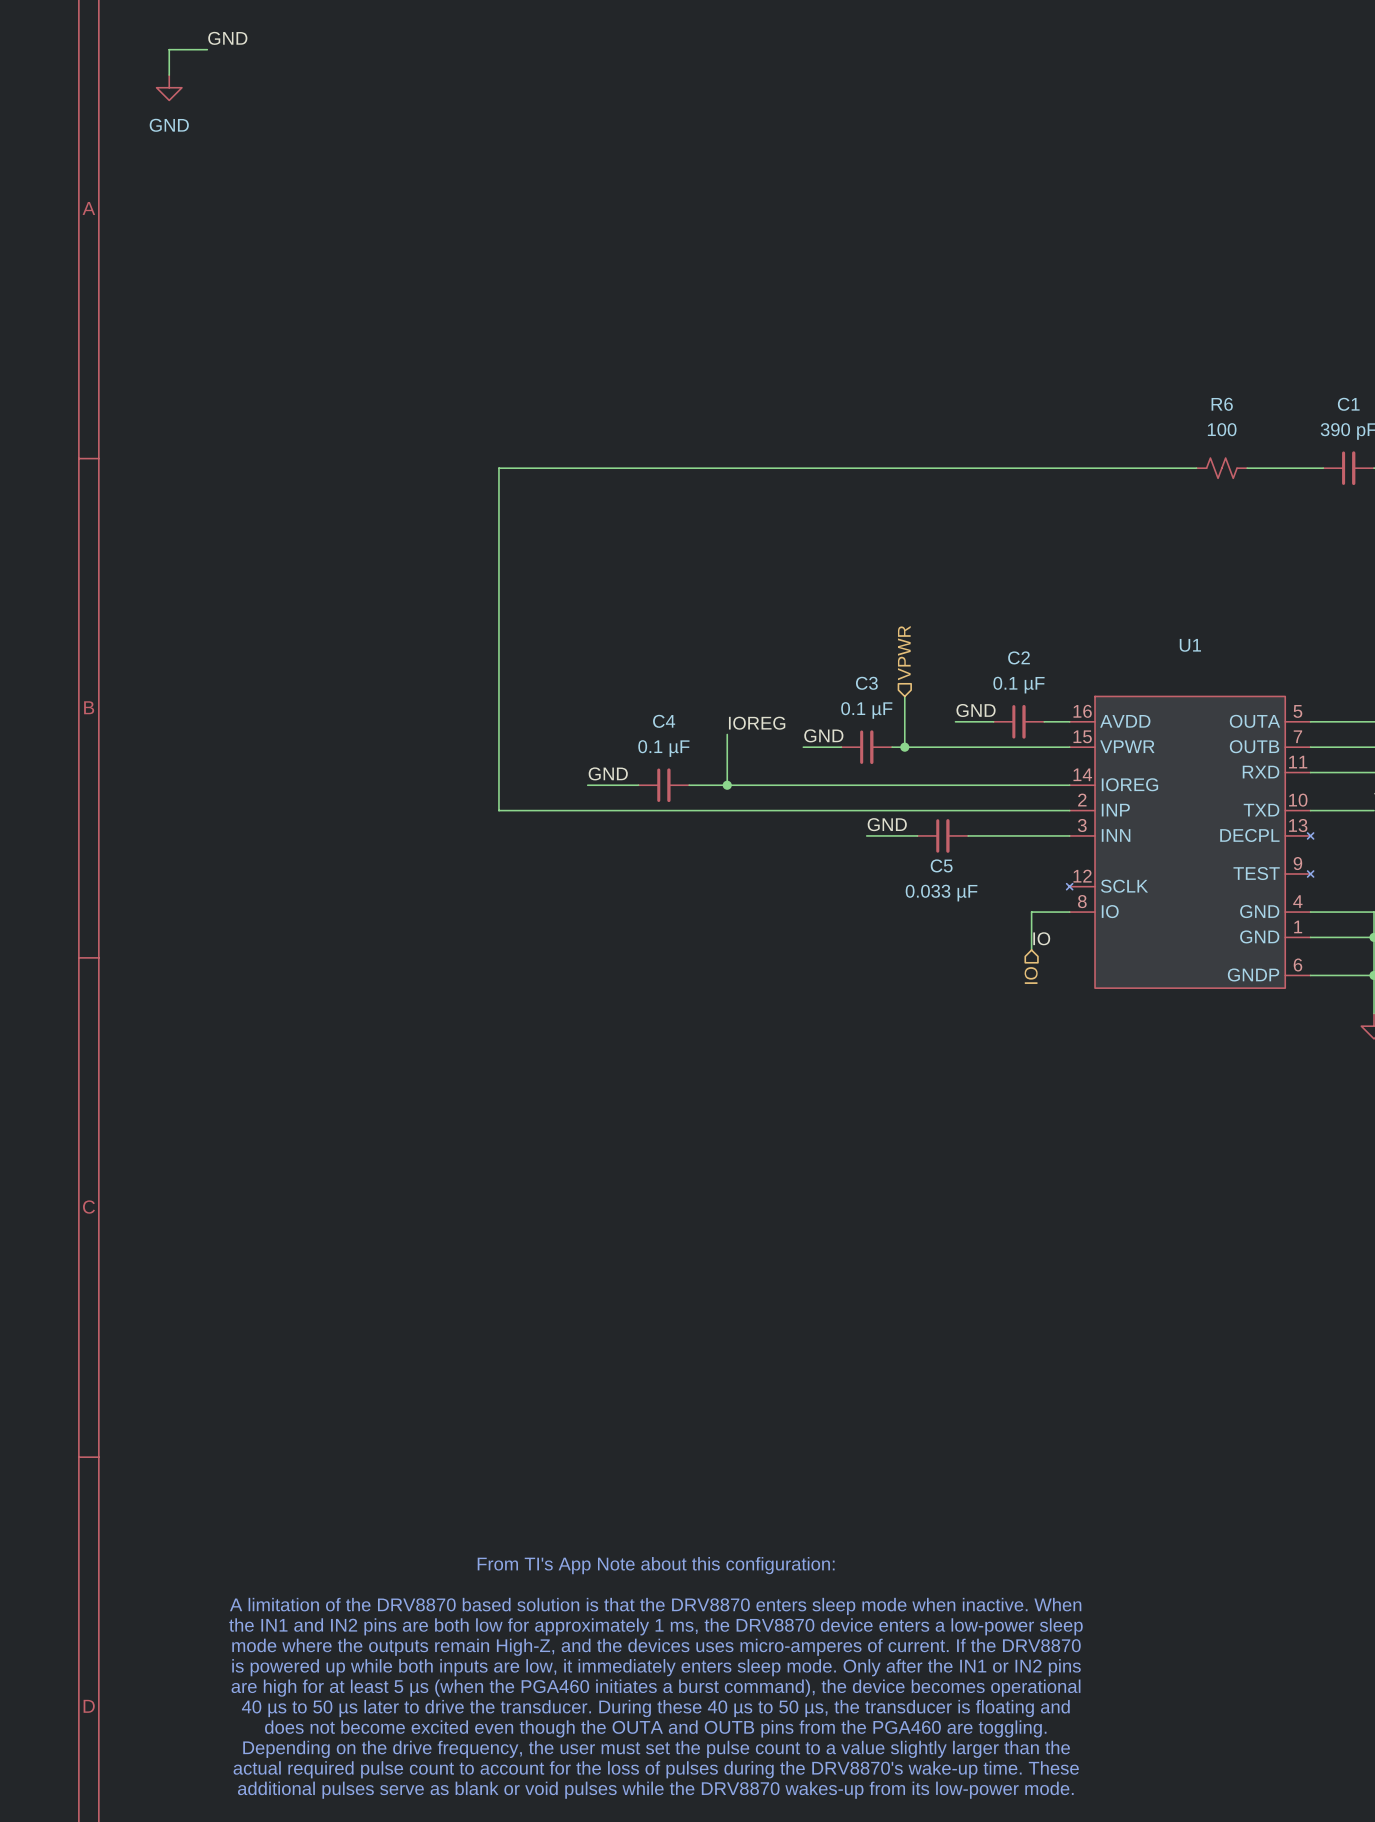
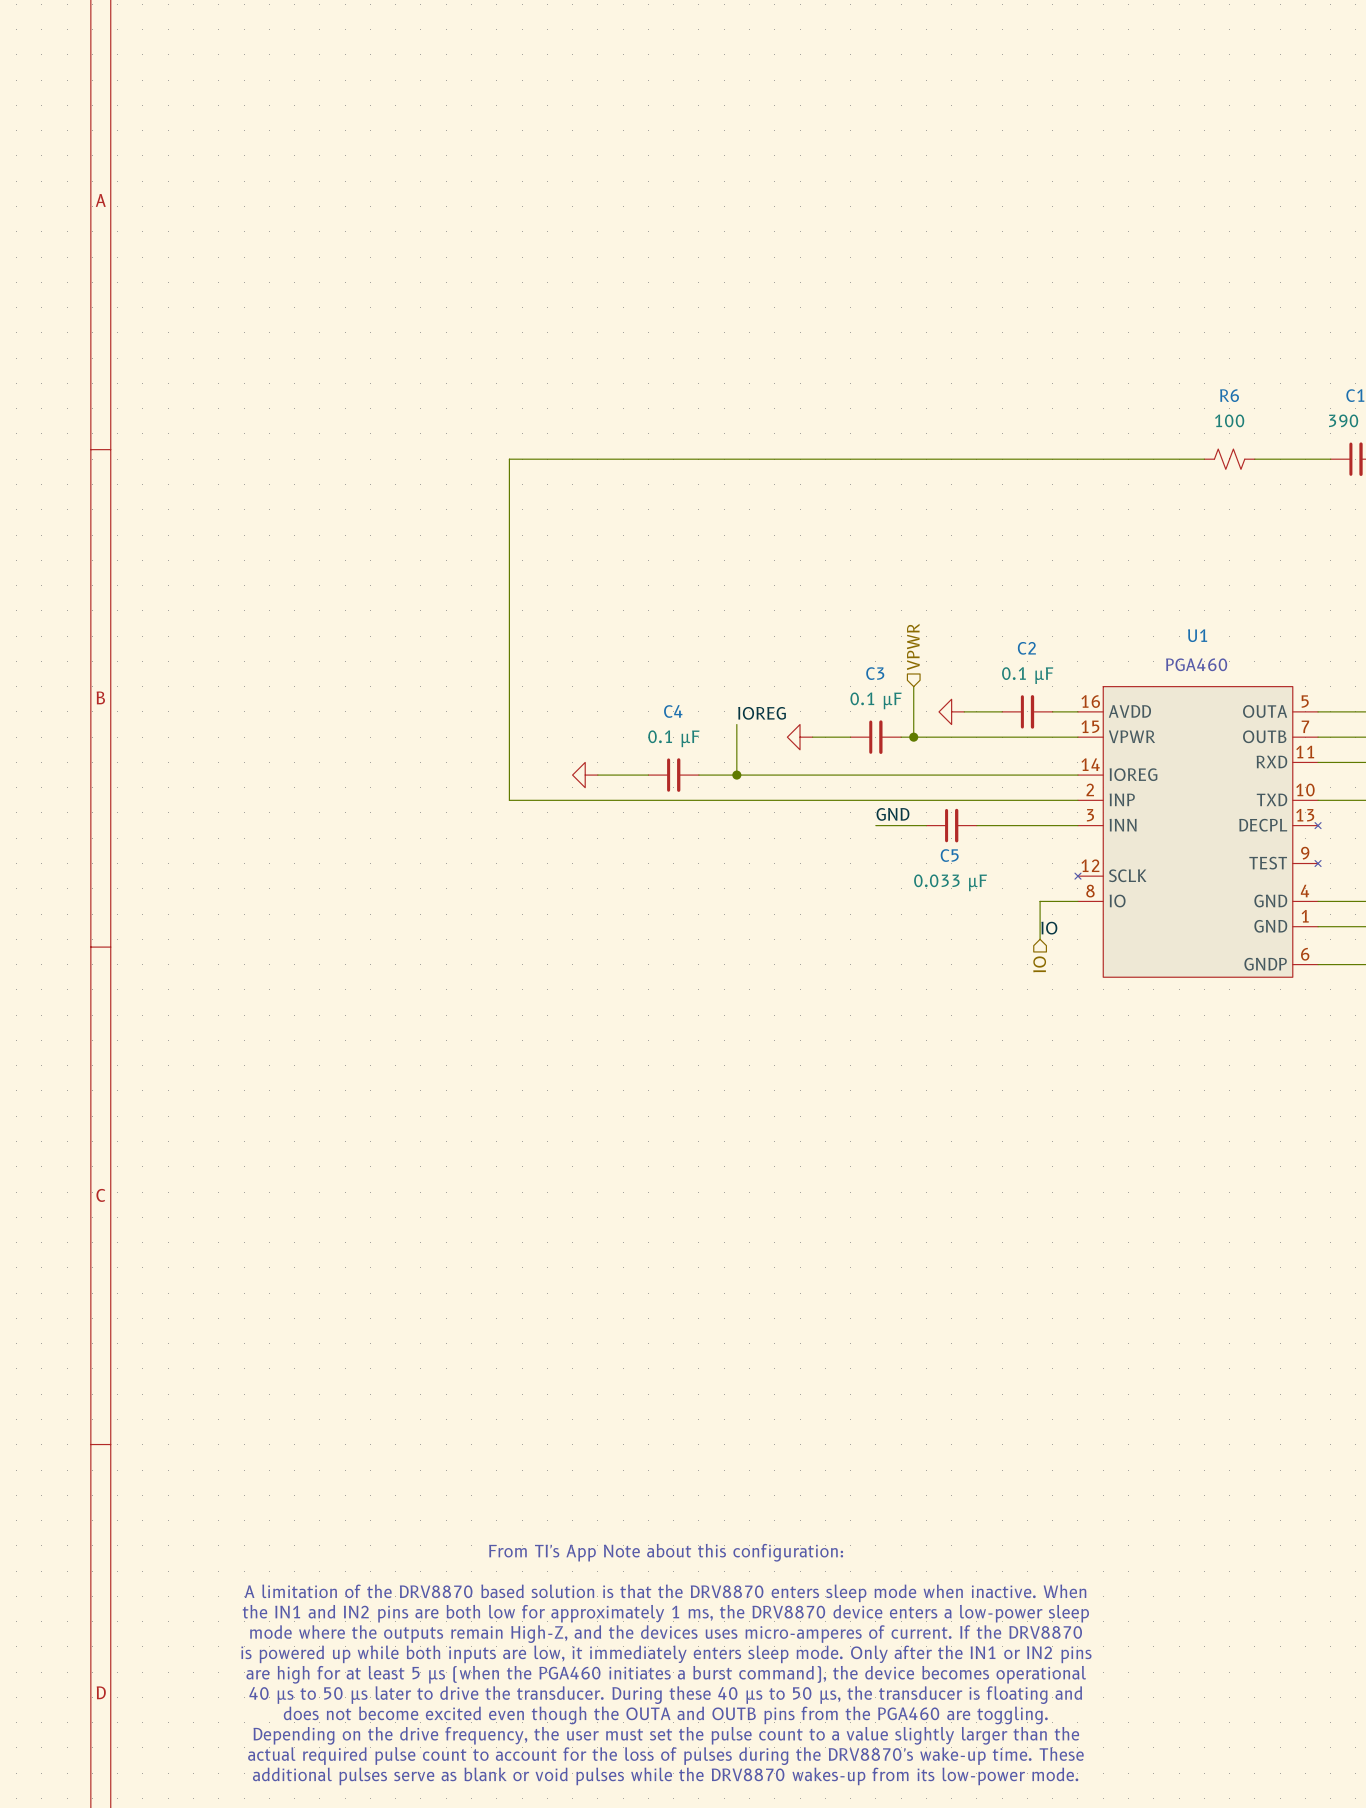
label: GND (227, 38) -> none
wire: (207, 49) (169, 49) (169, 75) -> none
power symbol: GND (169, 87) -> none
text: none -> PGA460 (1196, 664)
label: GND (976, 710) -> none
power symbol: none -> (951, 711)
label: GND (823, 735) -> none
power symbol: none -> (800, 737)
label: GND (608, 773) -> none
power symbol: none -> (585, 775)

